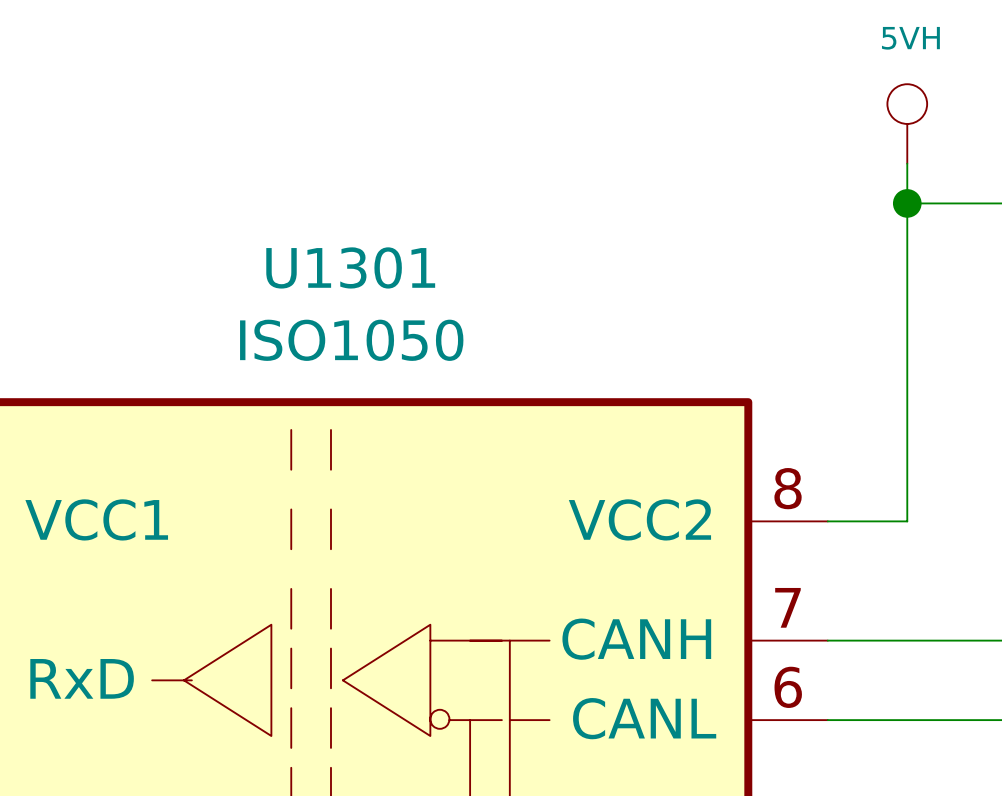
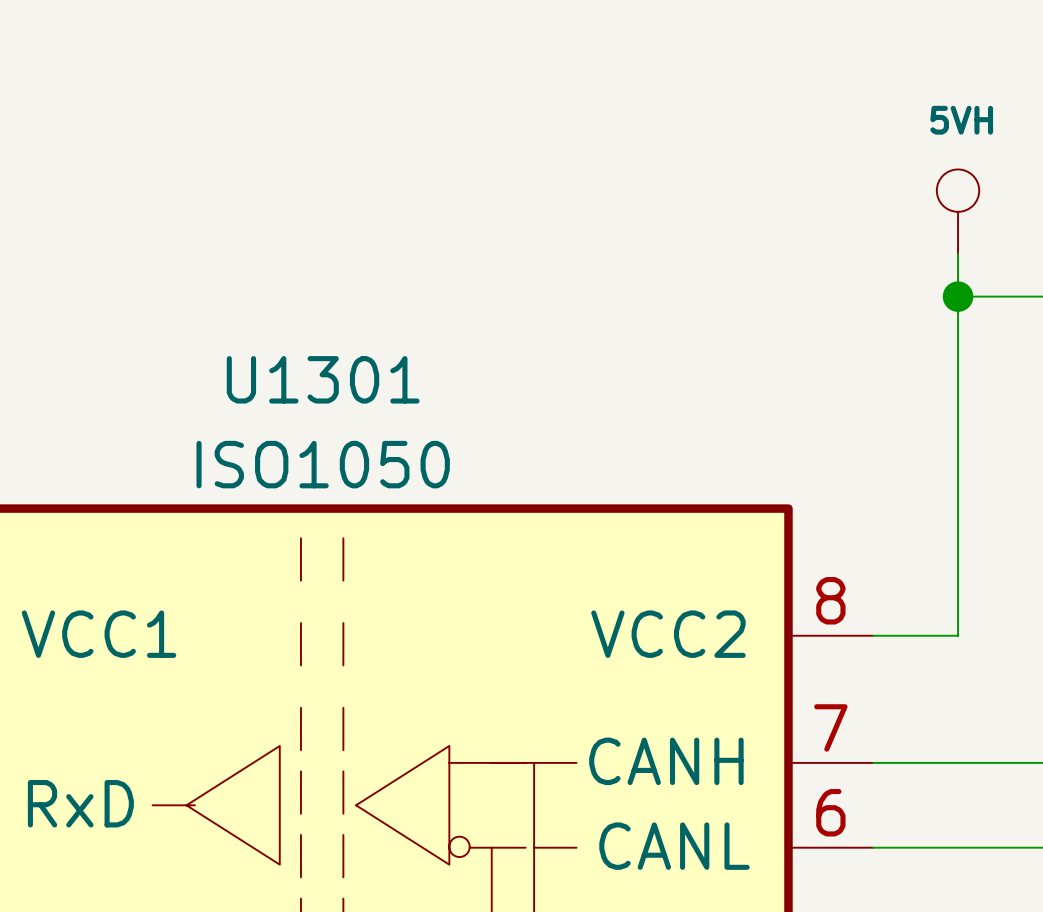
U1301 name position: U1301 (350, 267) -> U1301 (323, 379)
U1301 value position: ISO1050 (351, 340) -> ISO1050 (323, 464)

